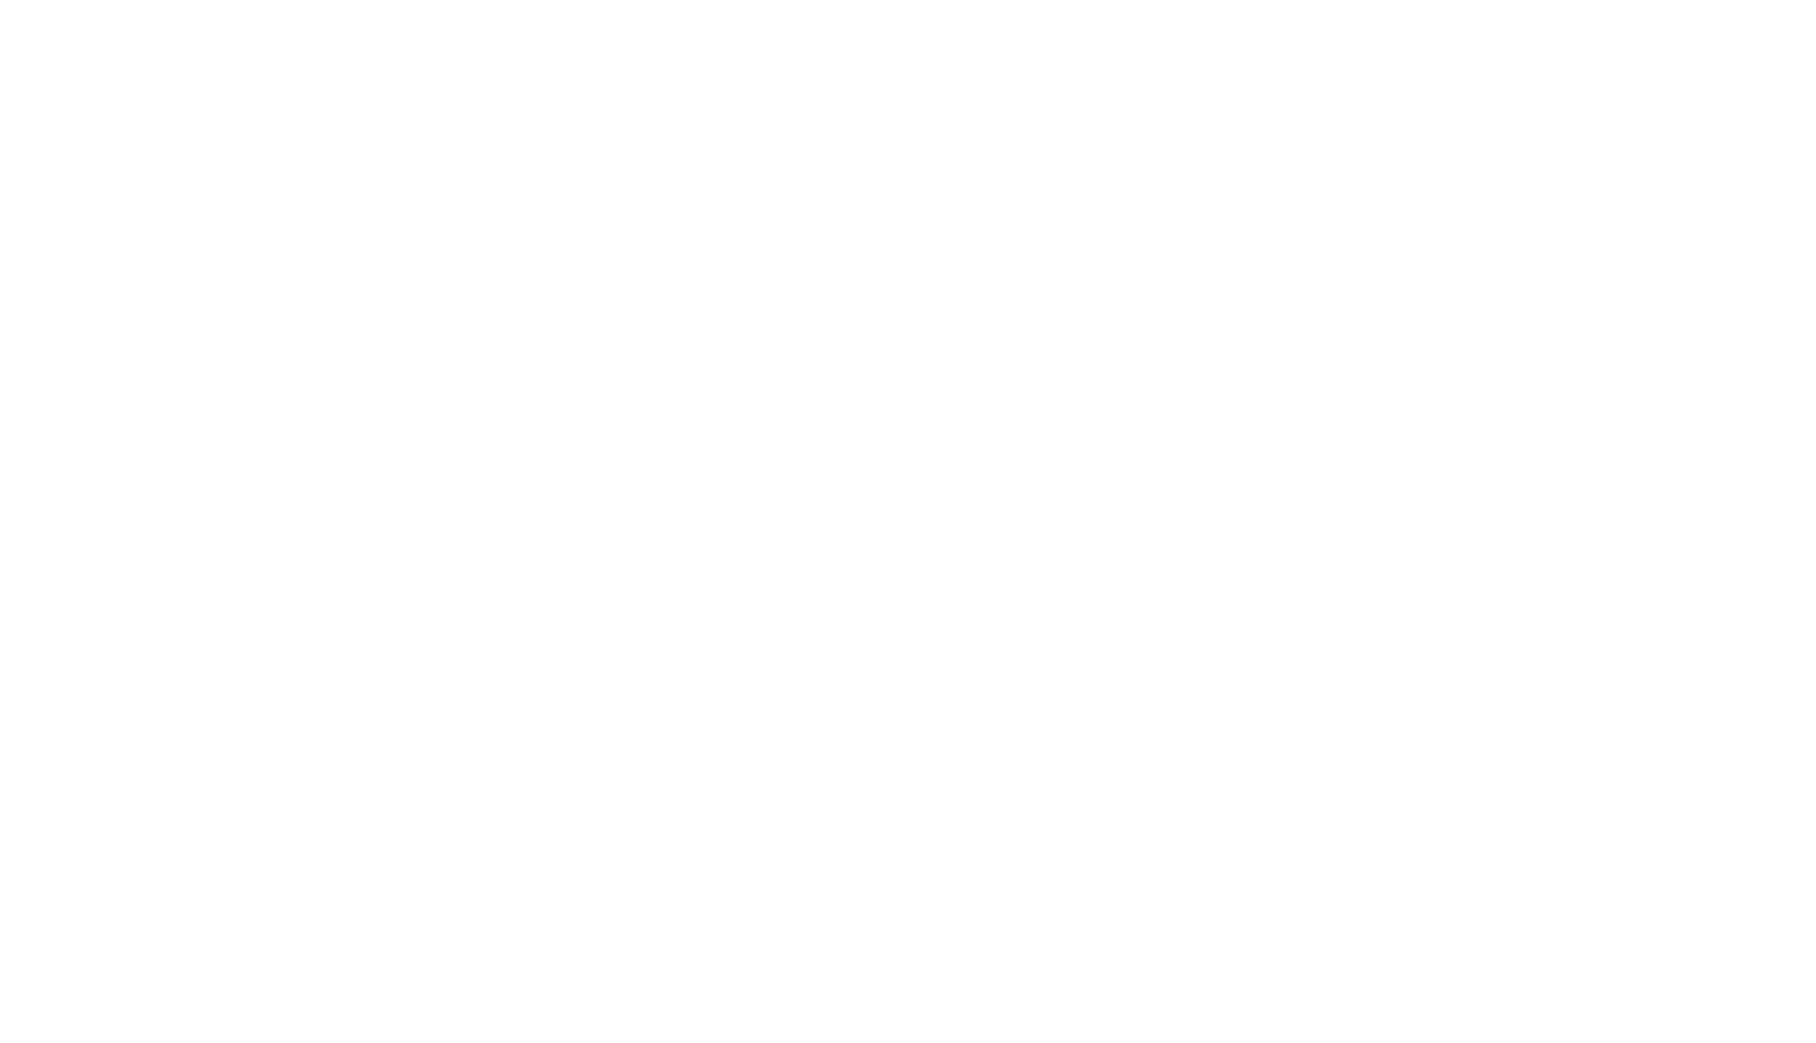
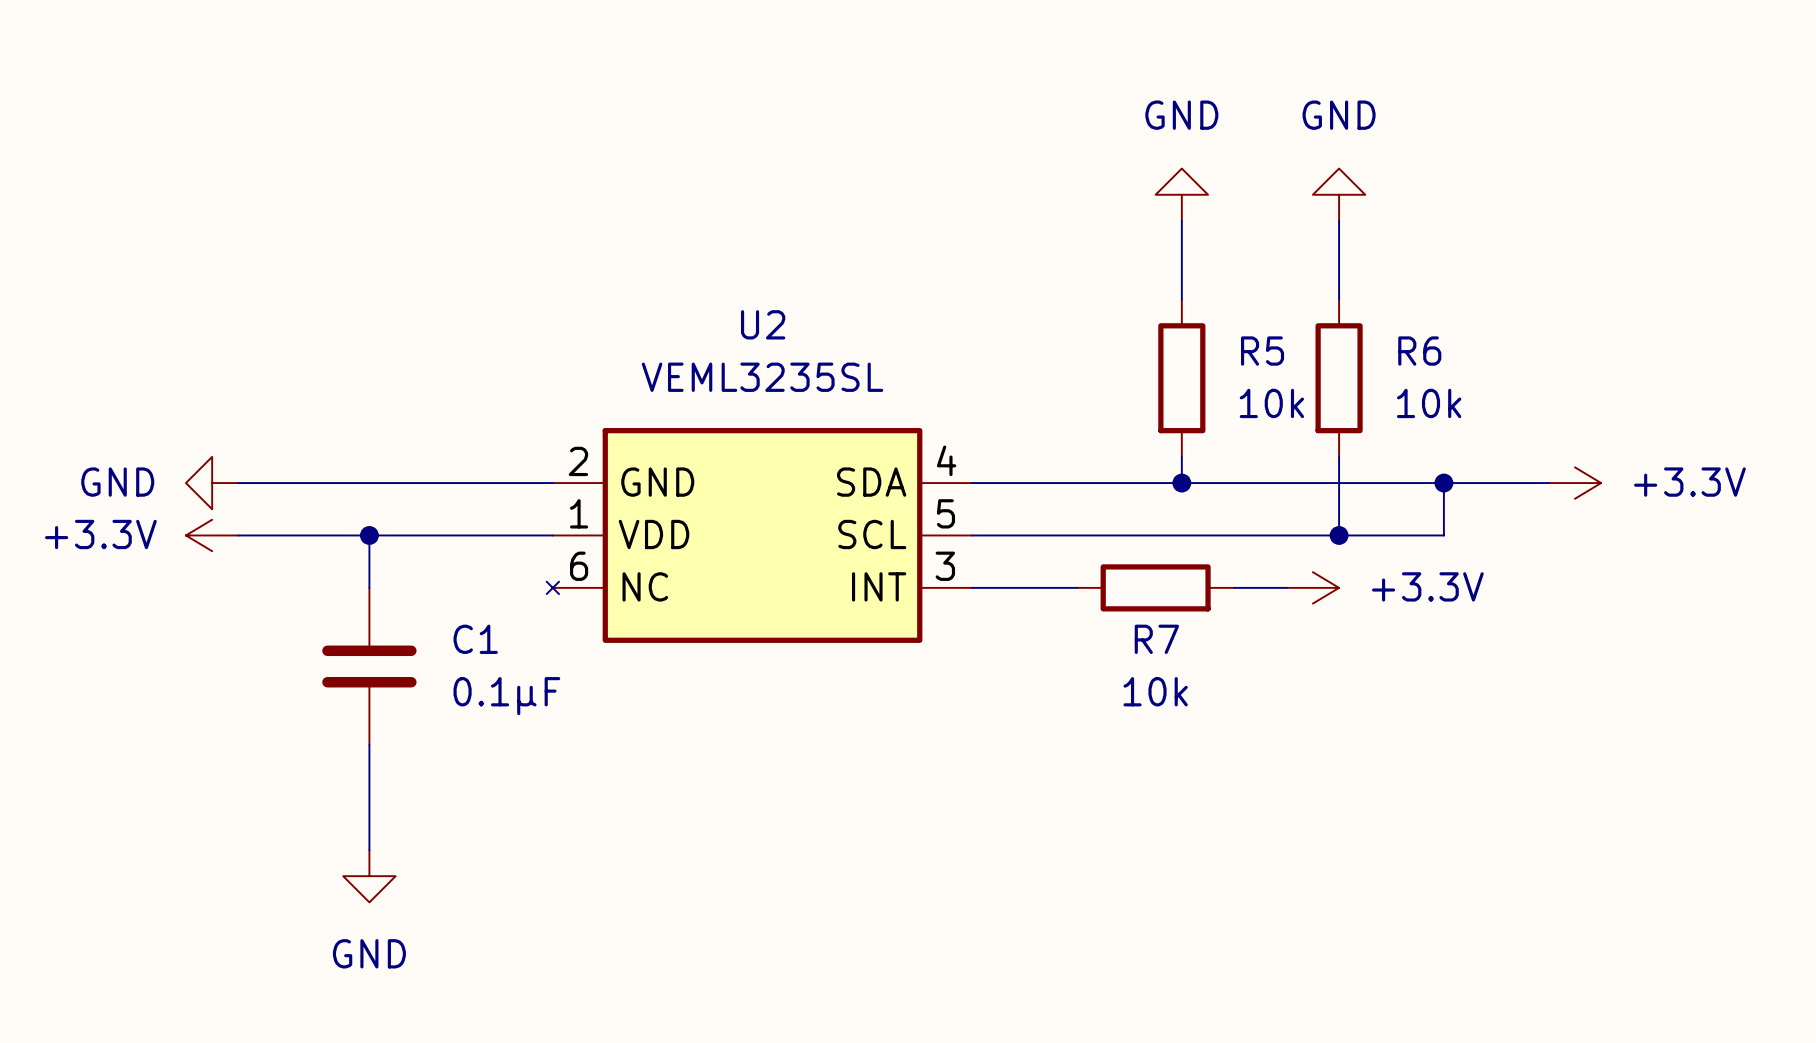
power symbol: none -> GND (1181, 194)
power symbol: none -> GND (1339, 194)
wire: none -> (1181, 220) (1181, 299)
wire: none -> (1339, 220) (1339, 299)
R5: none -> 10k (1181, 378)
R6: none -> 10k (1339, 378)
wire: none -> (1181, 456) (1181, 483)
wire: none -> (1339, 456) (1339, 535)
power symbol: none -> GND (212, 483)
wire: none -> (238, 483) (552, 483)
wire: none -> (972, 483) (1548, 483)
junction: none -> (1181, 483)
wire: none -> (1443, 483) (1443, 535) (972, 535)
junction: none -> (1443, 483)
power symbol: none -> +3.3V (1574, 483)
power symbol: none -> +3.3V (212, 535)
wire: none -> (238, 535) (552, 535)
wire: none -> (369, 535) (369, 587)
junction: none -> (369, 535)
U2: none -> VEML3235SL (759, 535)
junction: none -> (1339, 535)
wire: none -> (972, 587) (1077, 587)
R7: none -> 10k (1155, 587)
wire: none -> (1234, 587) (1286, 587)
power symbol: none -> +3.3V (1312, 587)
C1: none -> 0.1µF (369, 666)
wire: none -> (369, 745) (369, 849)
power symbol: none -> GND (369, 876)

